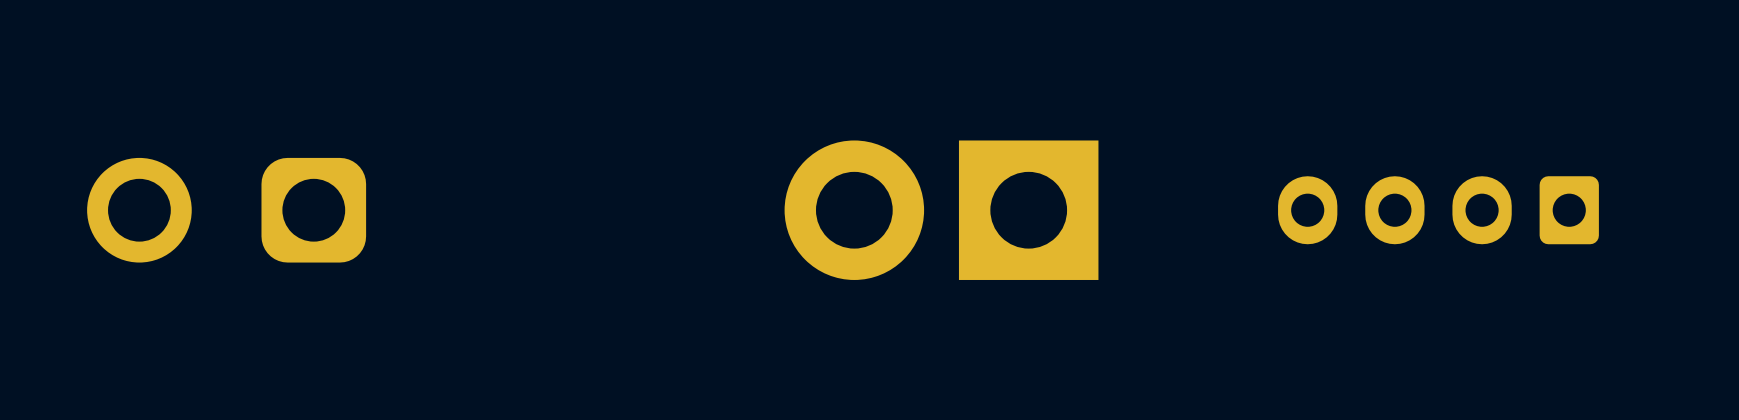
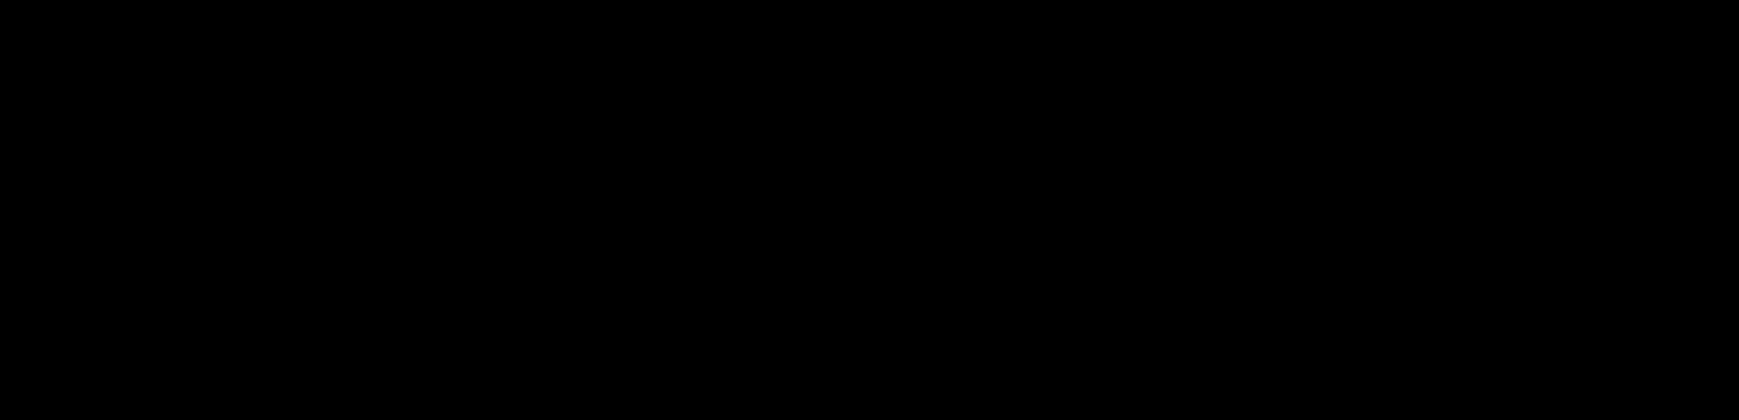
part: (226, 210) -> none
part: (941, 210) -> none
part: (1438, 210) -> none

